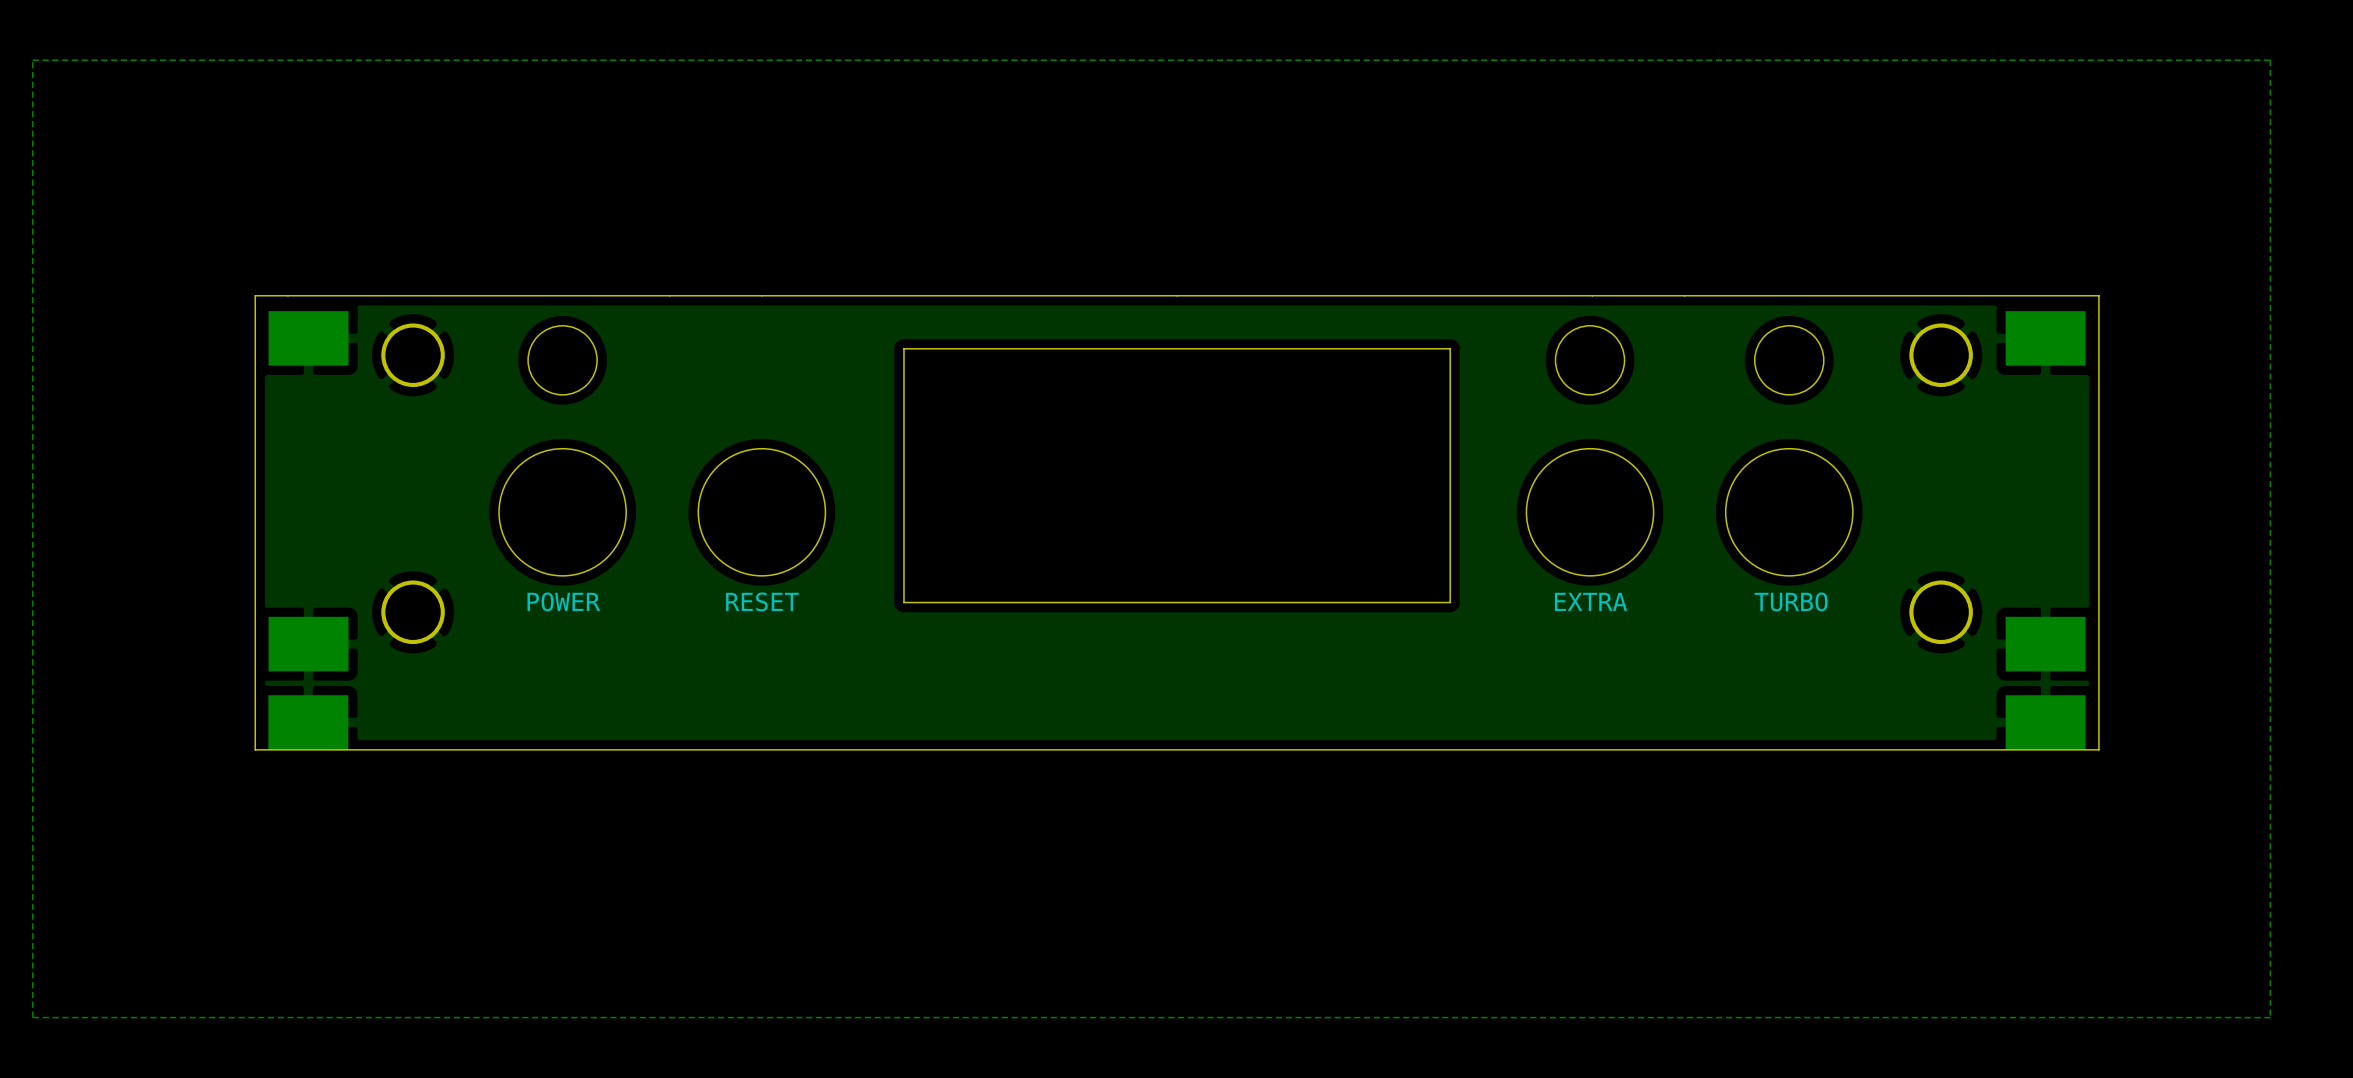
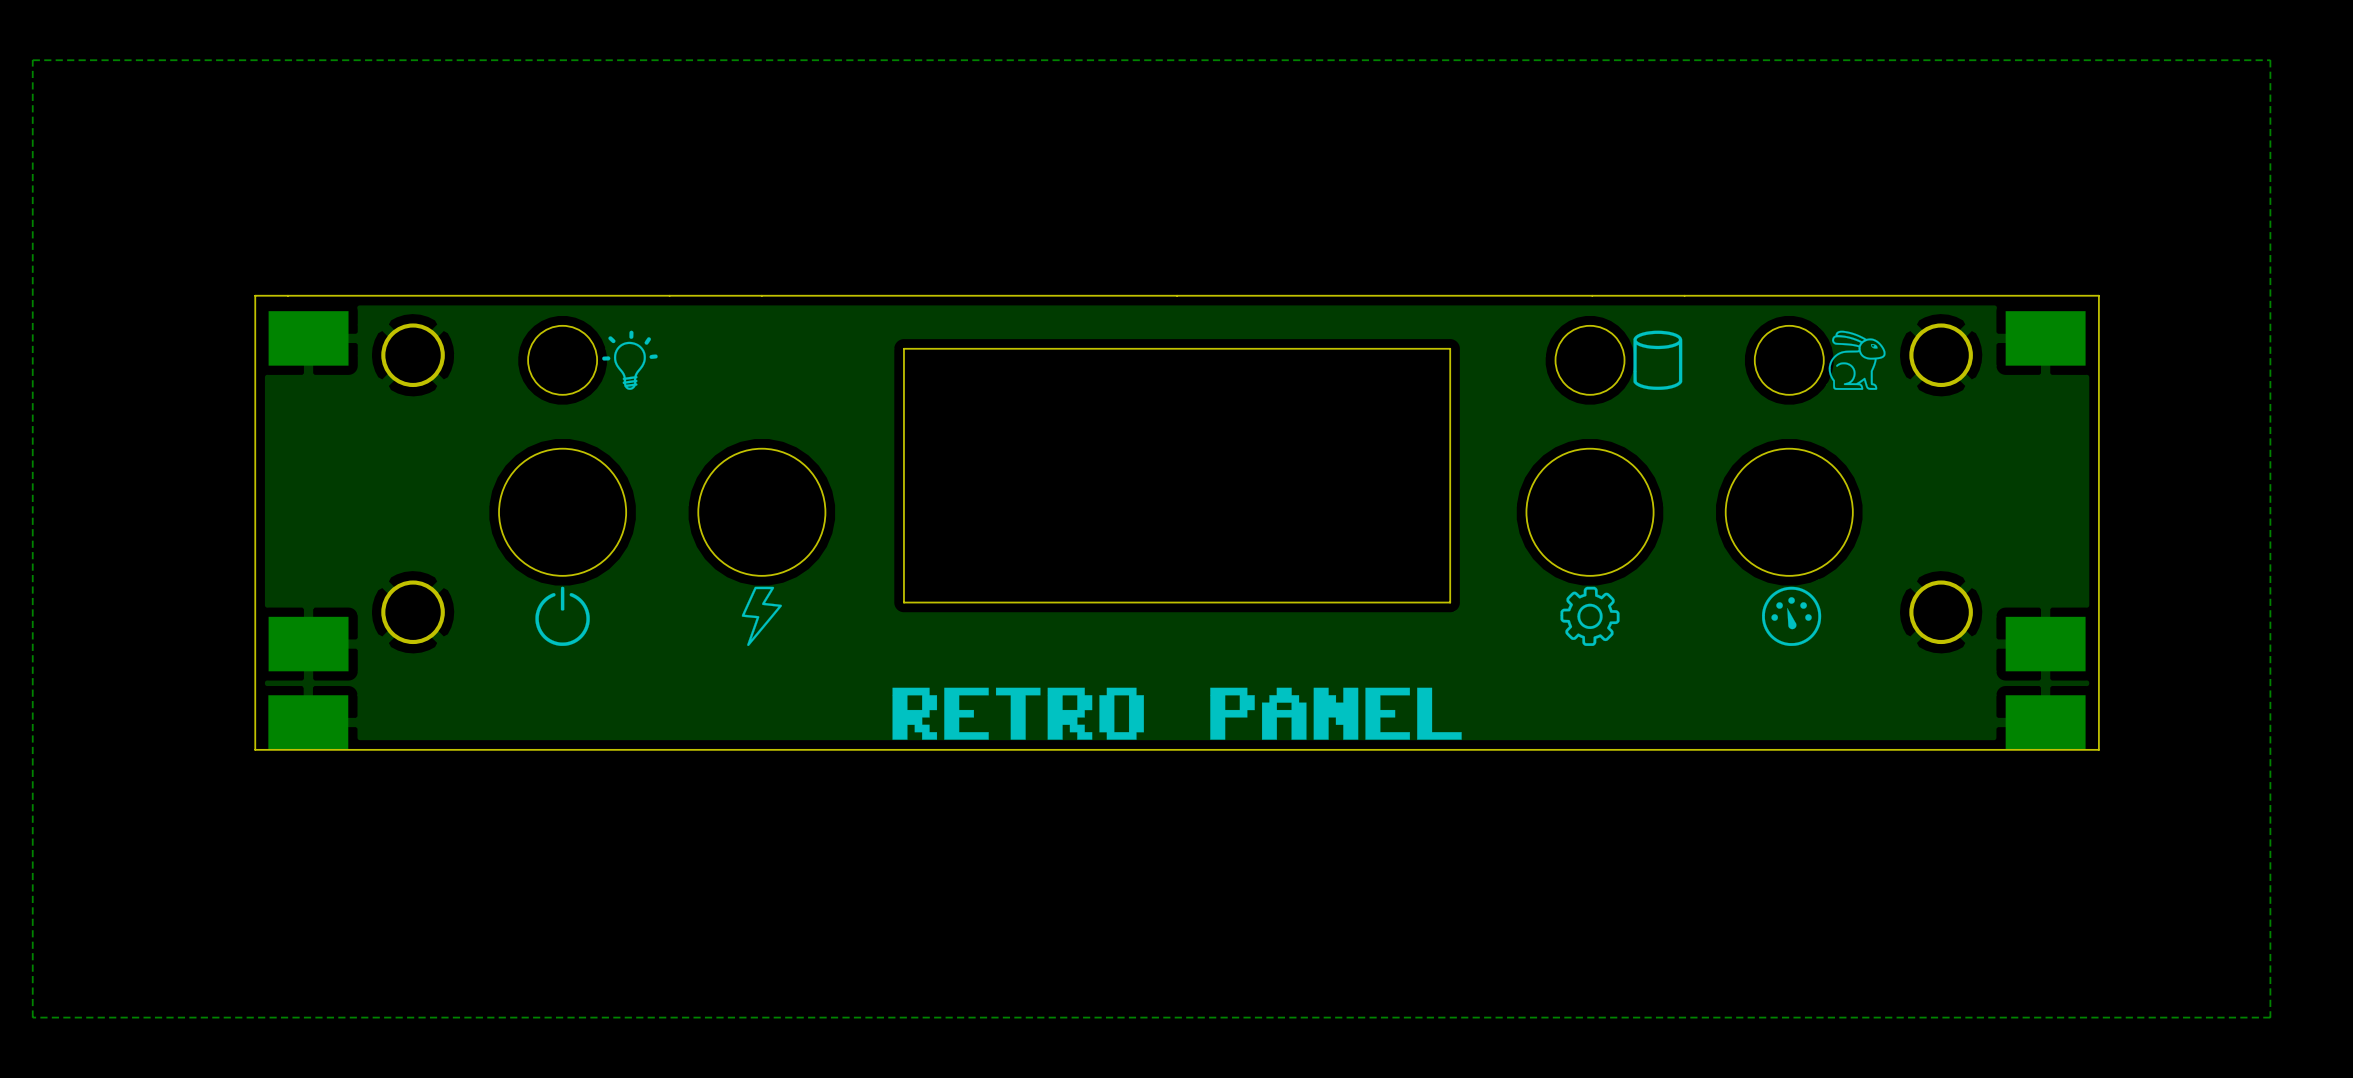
drawing: none -> [602, 330, 658, 390]
drawing: none -> [1633, 330, 1683, 390]
drawing: none -> [1828, 330, 1886, 390]
drawing: none -> [535, 586, 590, 646]
drawing: none -> [741, 586, 782, 646]
drawing: none -> [1560, 586, 1620, 646]
drawing: none -> [1762, 586, 1822, 646]
text: POWER (563, 601) -> none
text: RESET (762, 601) -> none
text: EXTRA (1590, 601) -> none
text: TURBO (1791, 601) -> none
drawing: none -> [892, 687, 1462, 740]

